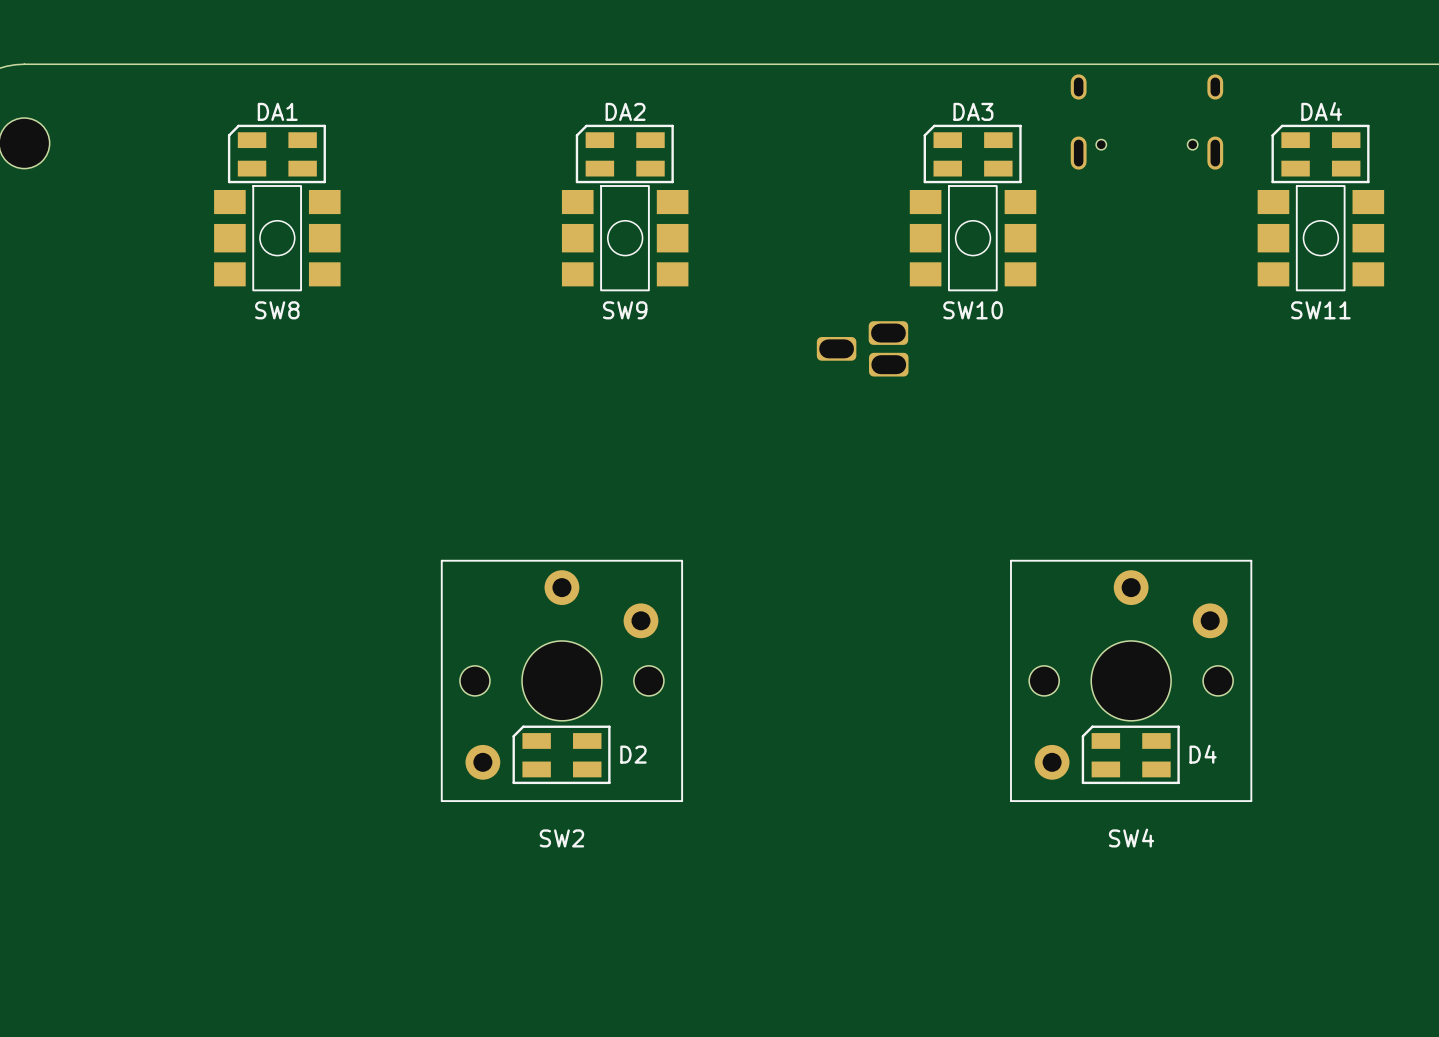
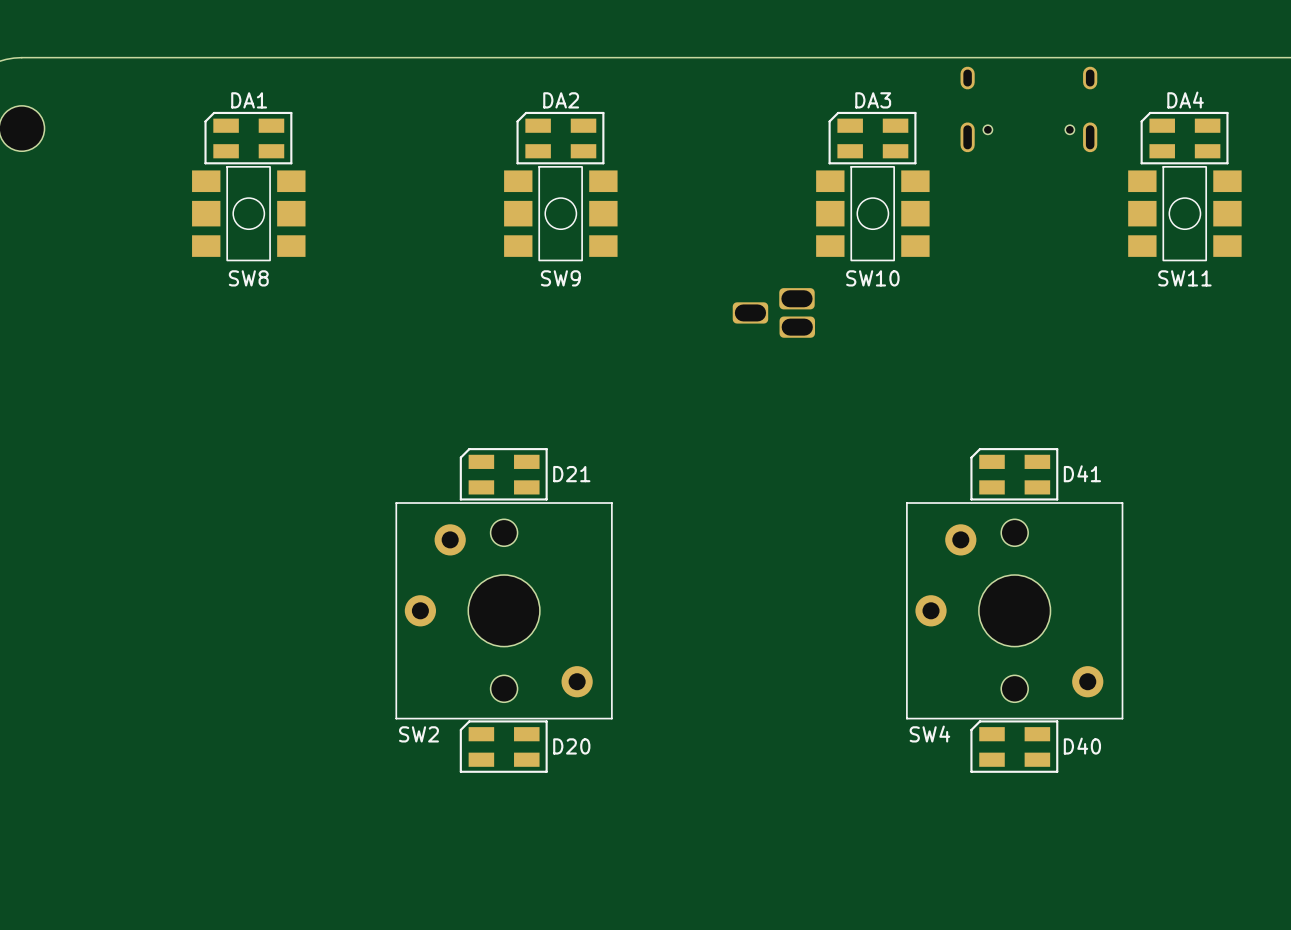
D21: none -> (503, 474)
D41: none -> (1014, 474)
SW2 rotation: 0° (561, 680) -> 90° counterclockwise (504, 610)
SW4 rotation: 0° (1131, 680) -> 90° counterclockwise (1014, 610)
D2: (561, 754) -> none
D4: (1130, 754) -> none
D20: none -> (503, 746)
D40: none -> (1014, 746)
SW2 name position: SW2 (561, 838) -> SW2 (418, 734)
SW4 name position: SW4 (1131, 838) -> SW4 (929, 734)

